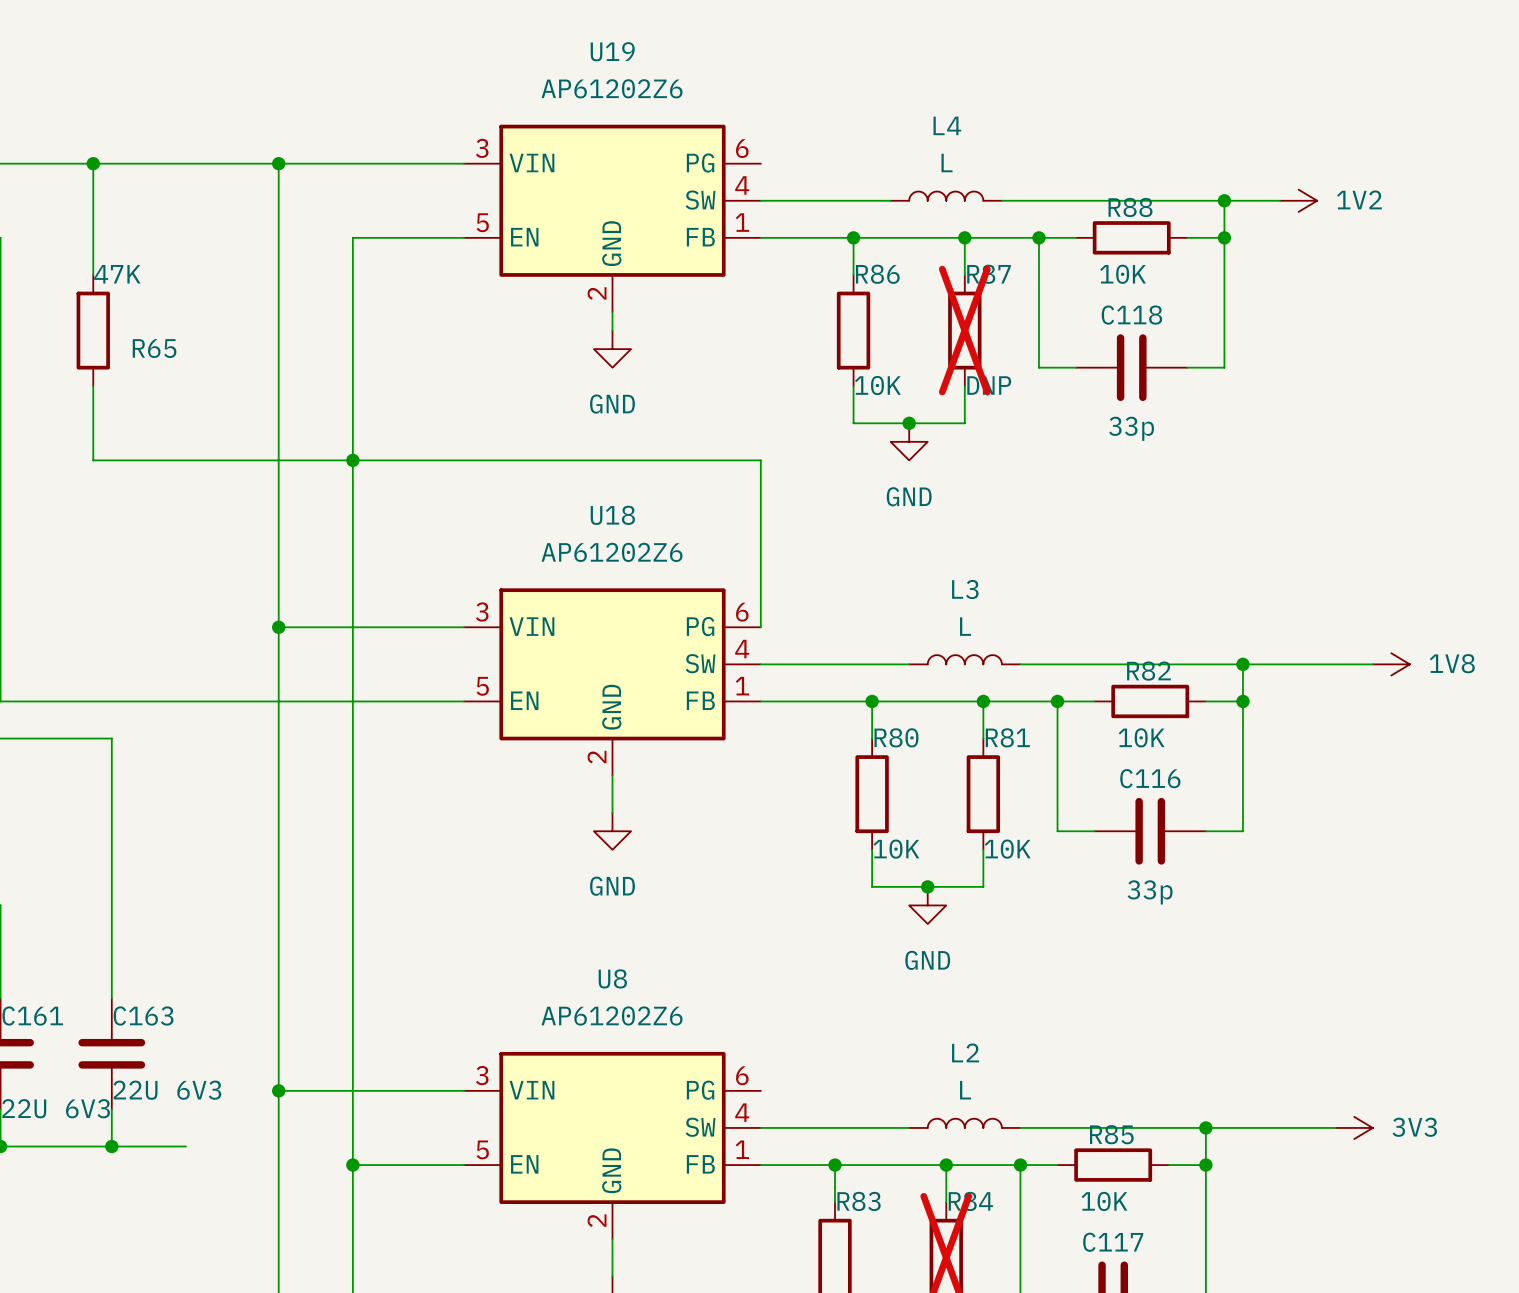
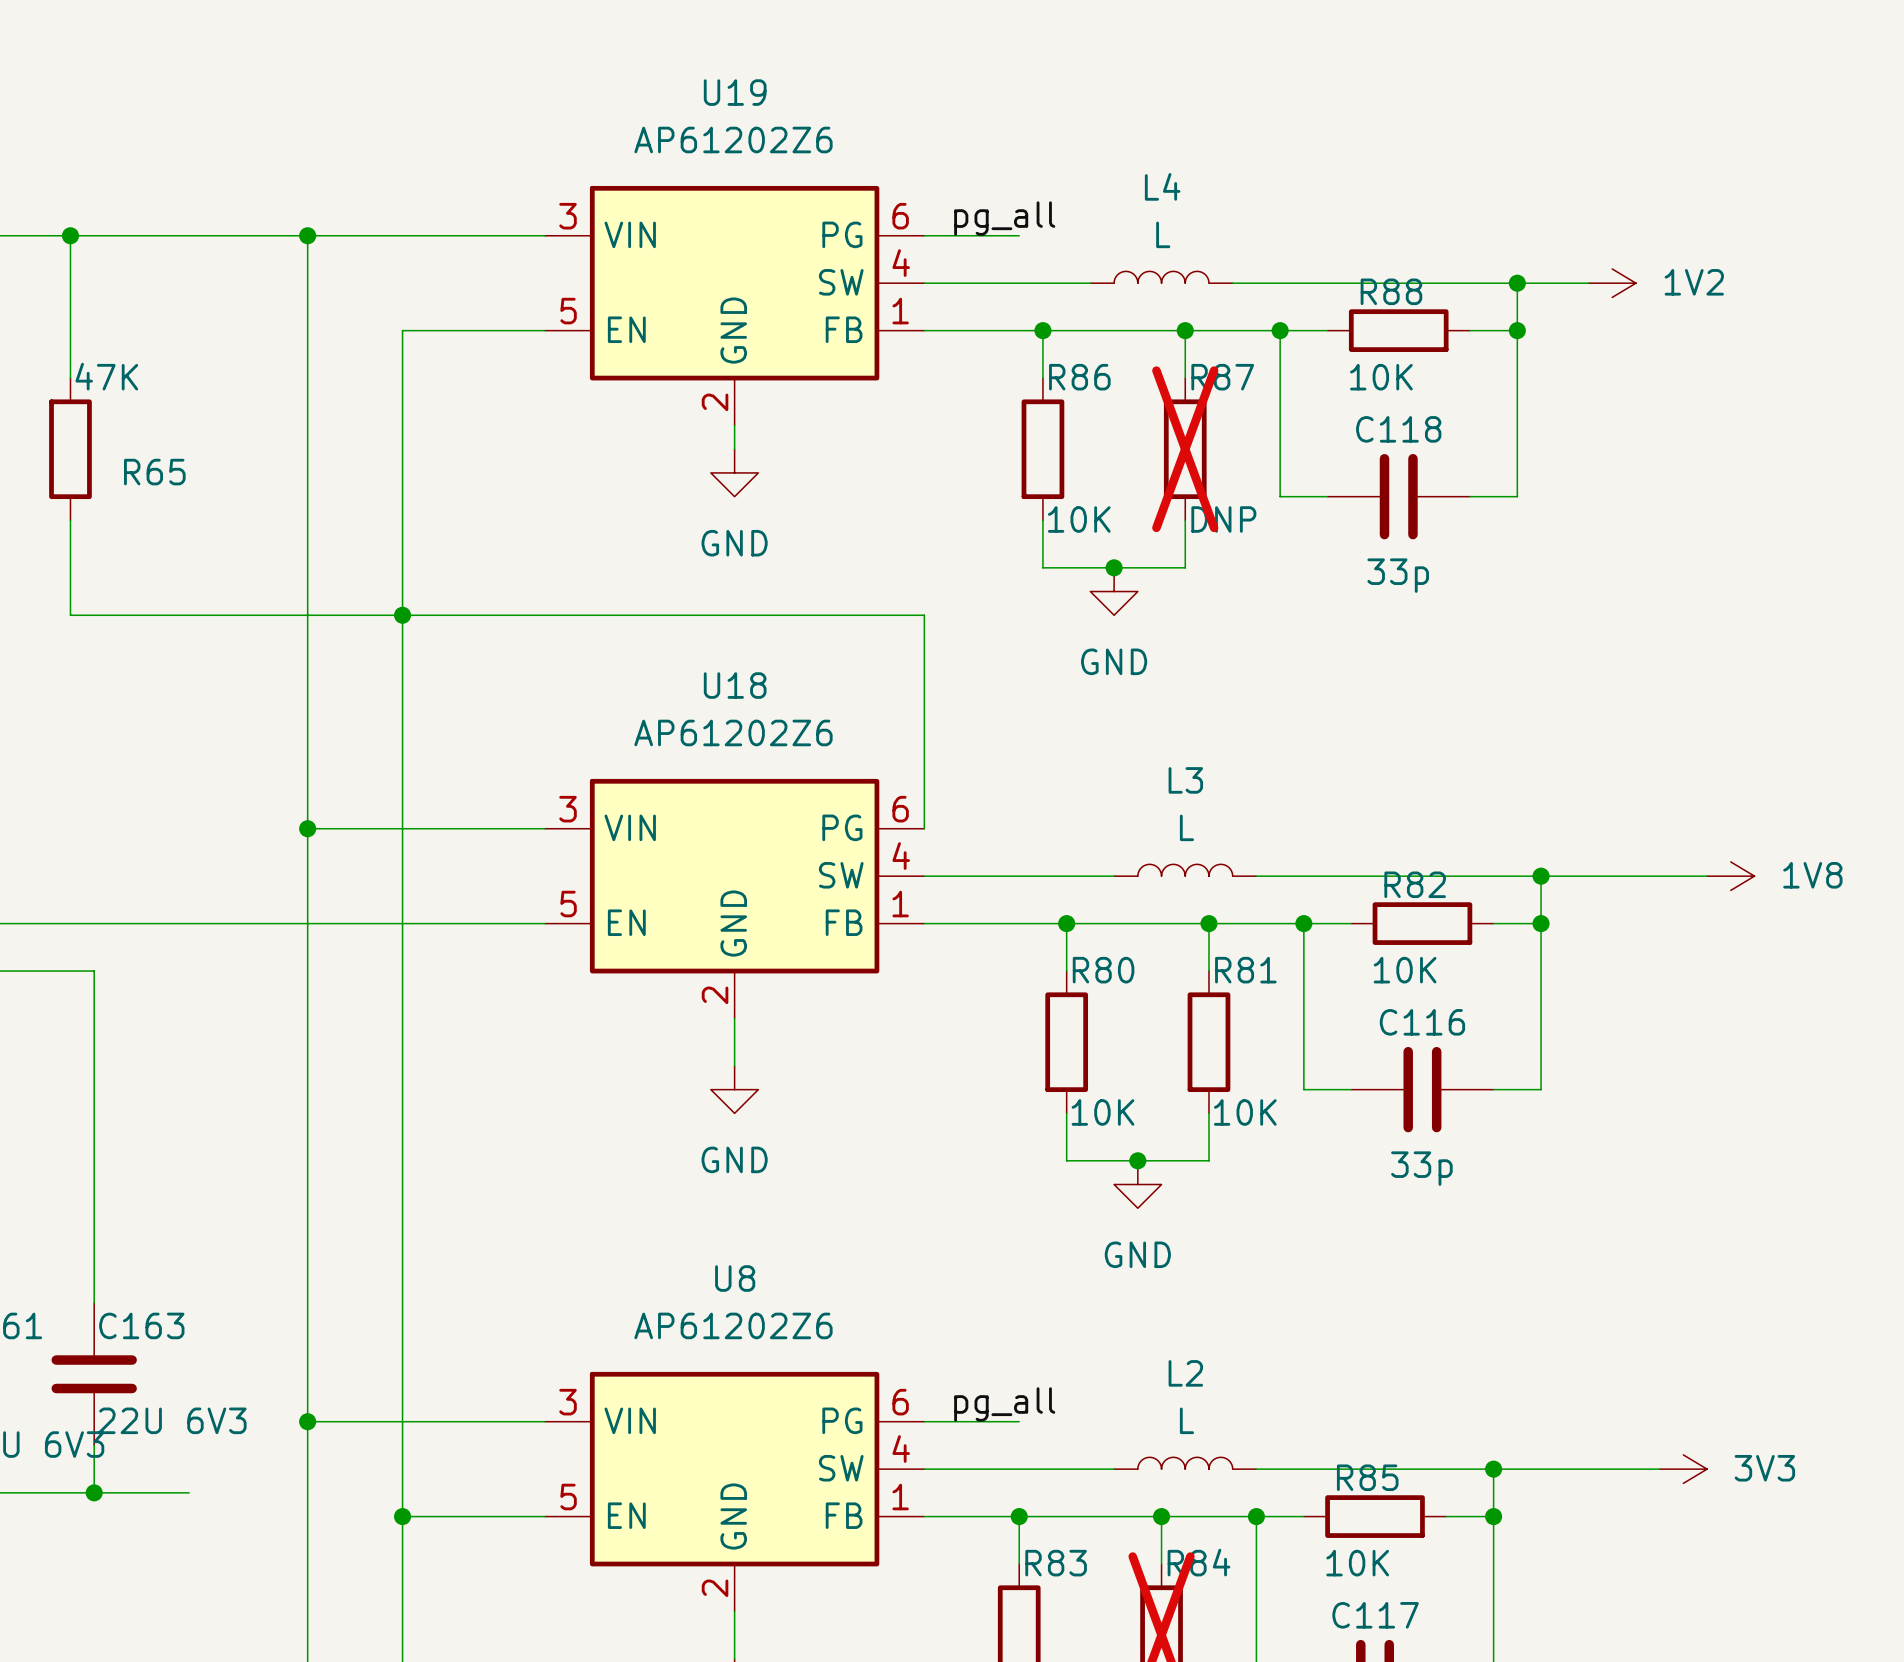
label: none -> pg_all (1004, 218)
wire: none -> (924, 235) (1019, 235)
label: none -> pg_all (1004, 1404)
wire: none -> (924, 1421) (1019, 1421)

